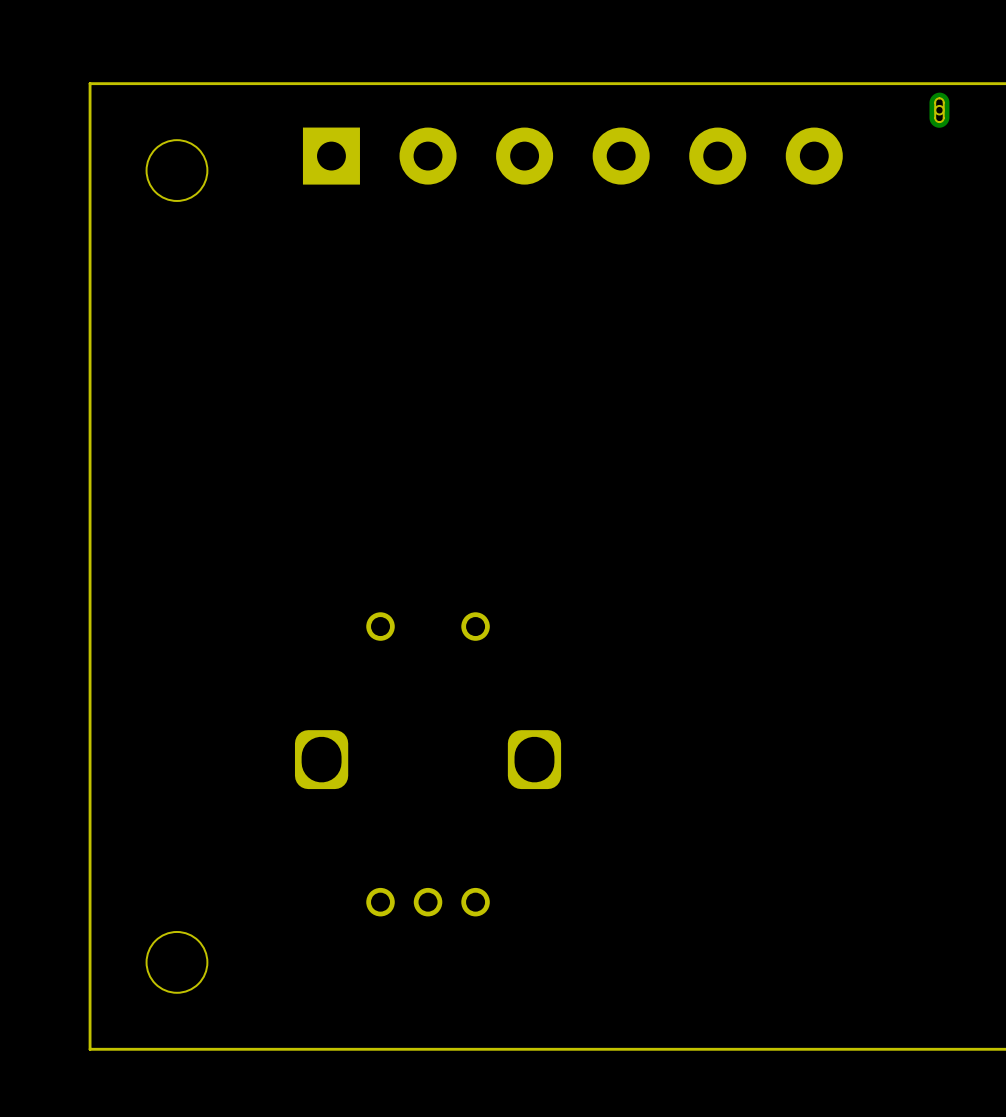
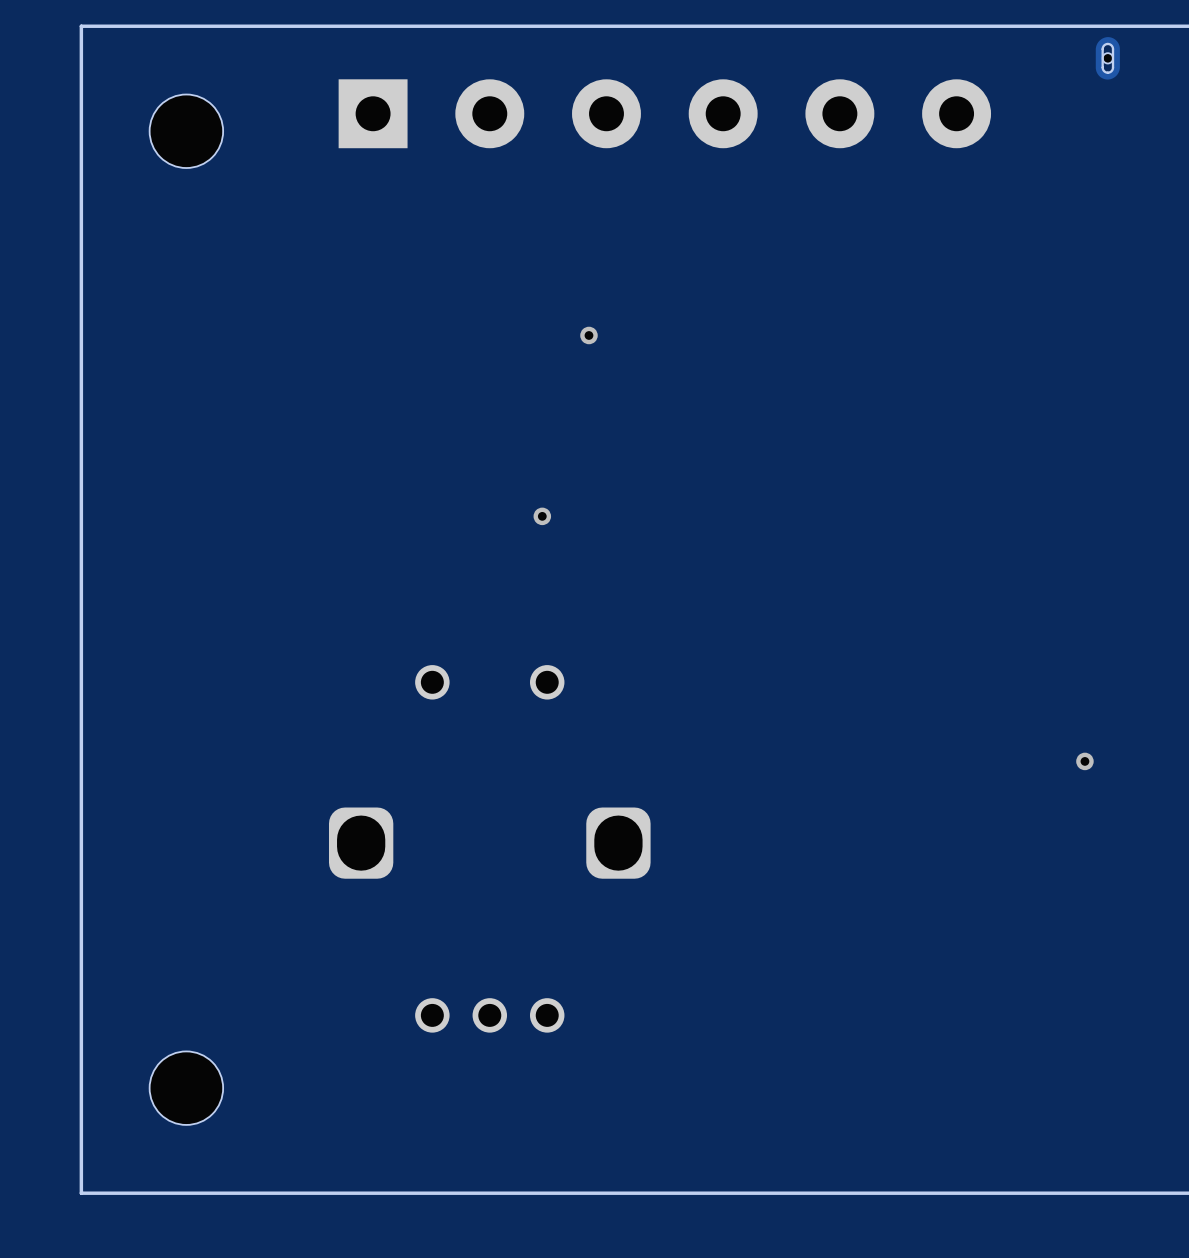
via: none -> (588, 335)
via: none -> (542, 516)
via: none -> (1084, 761)

